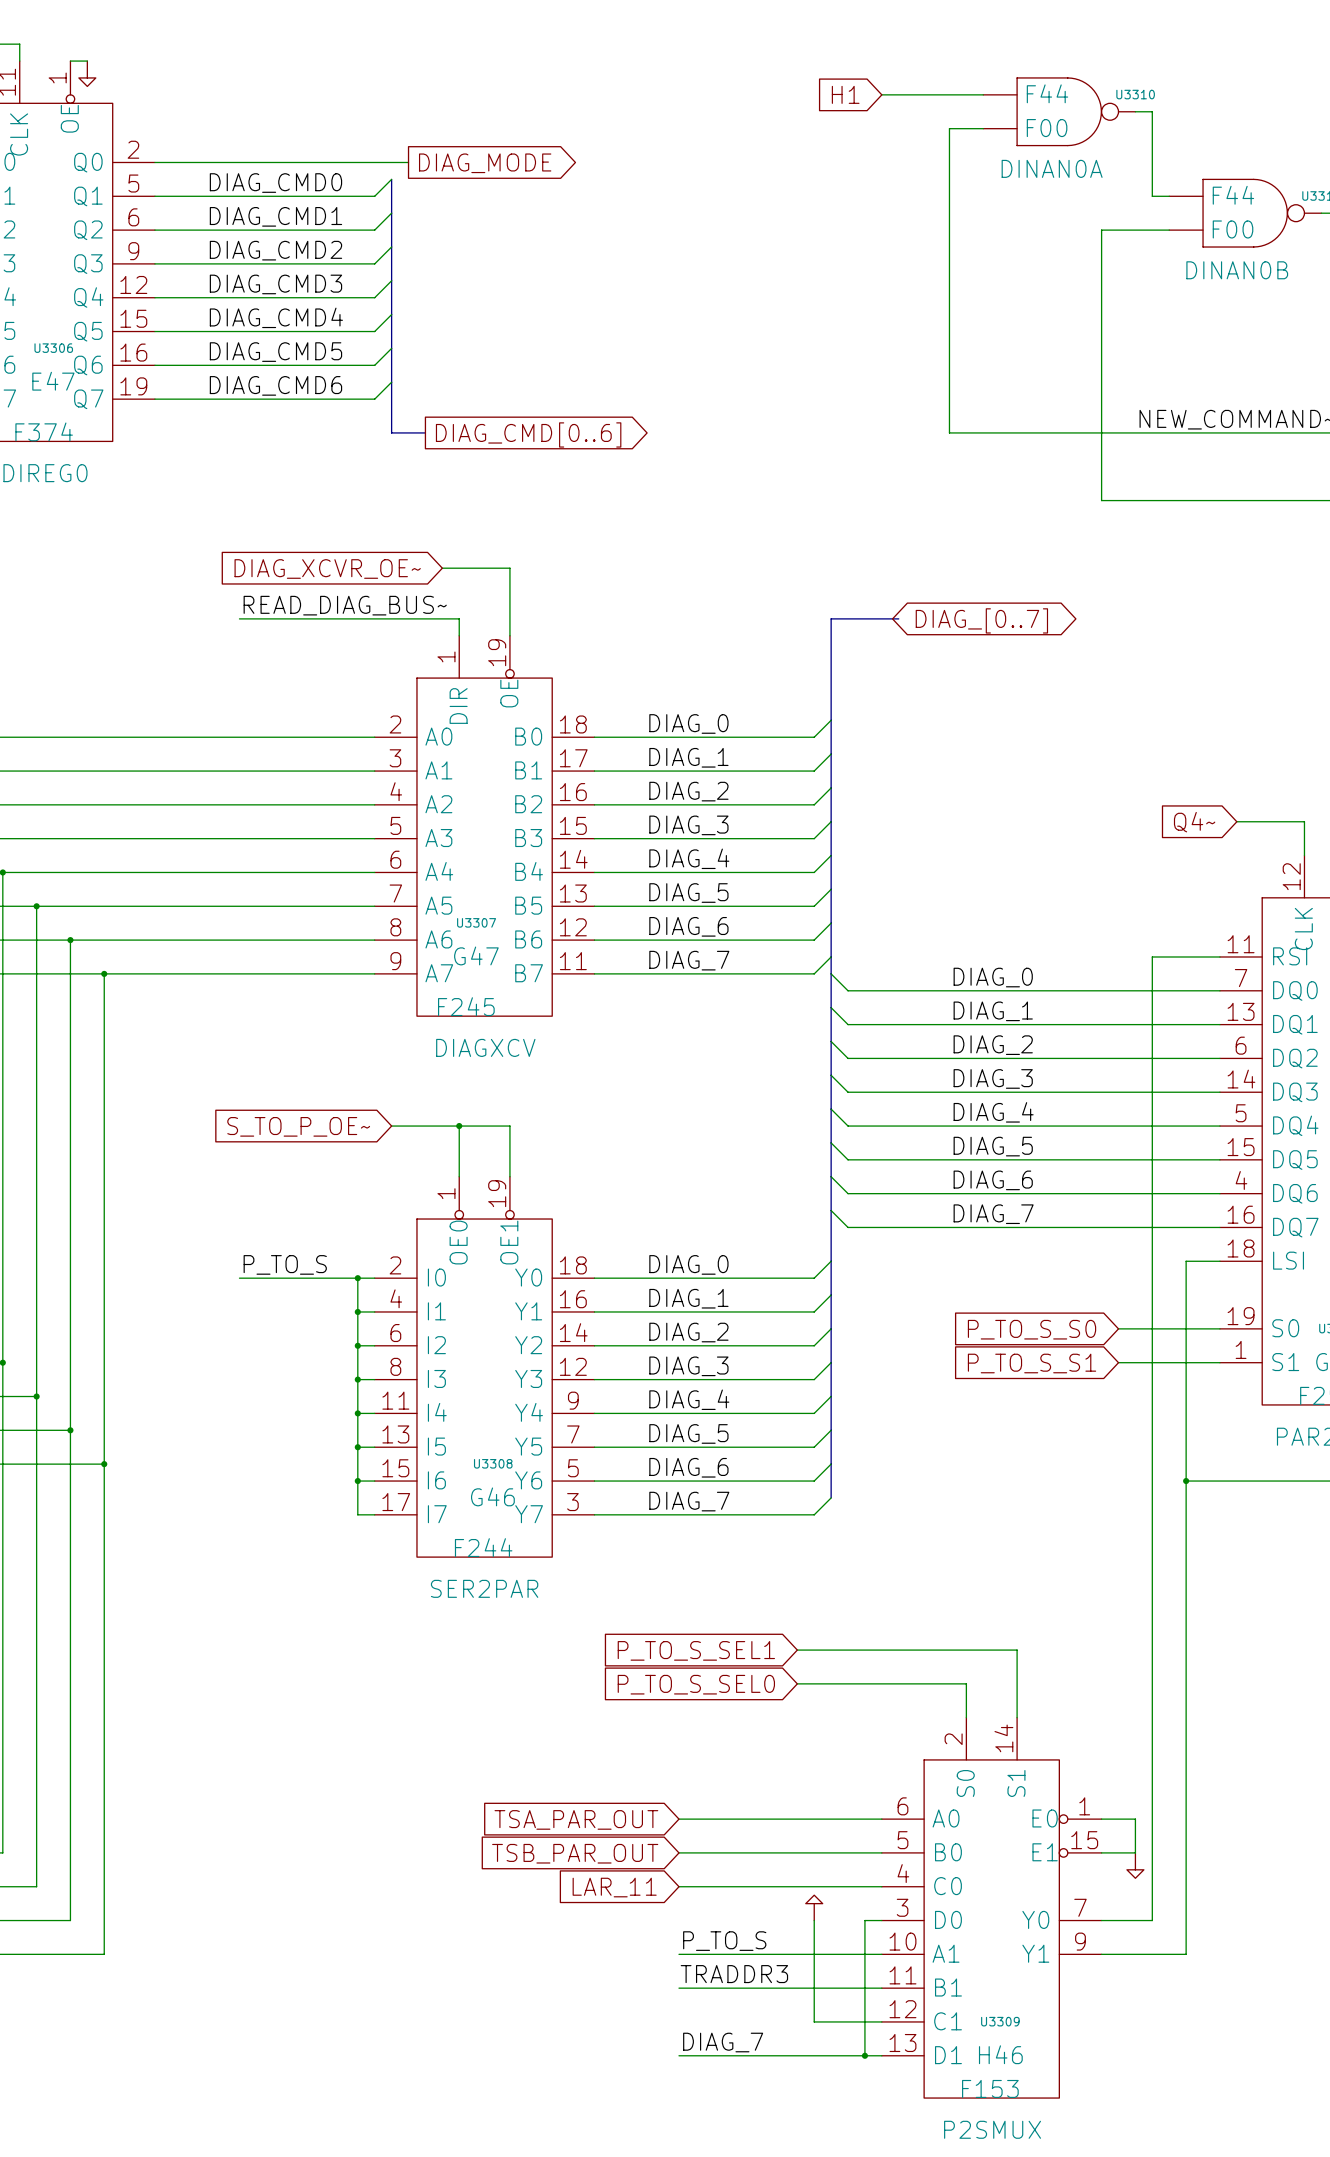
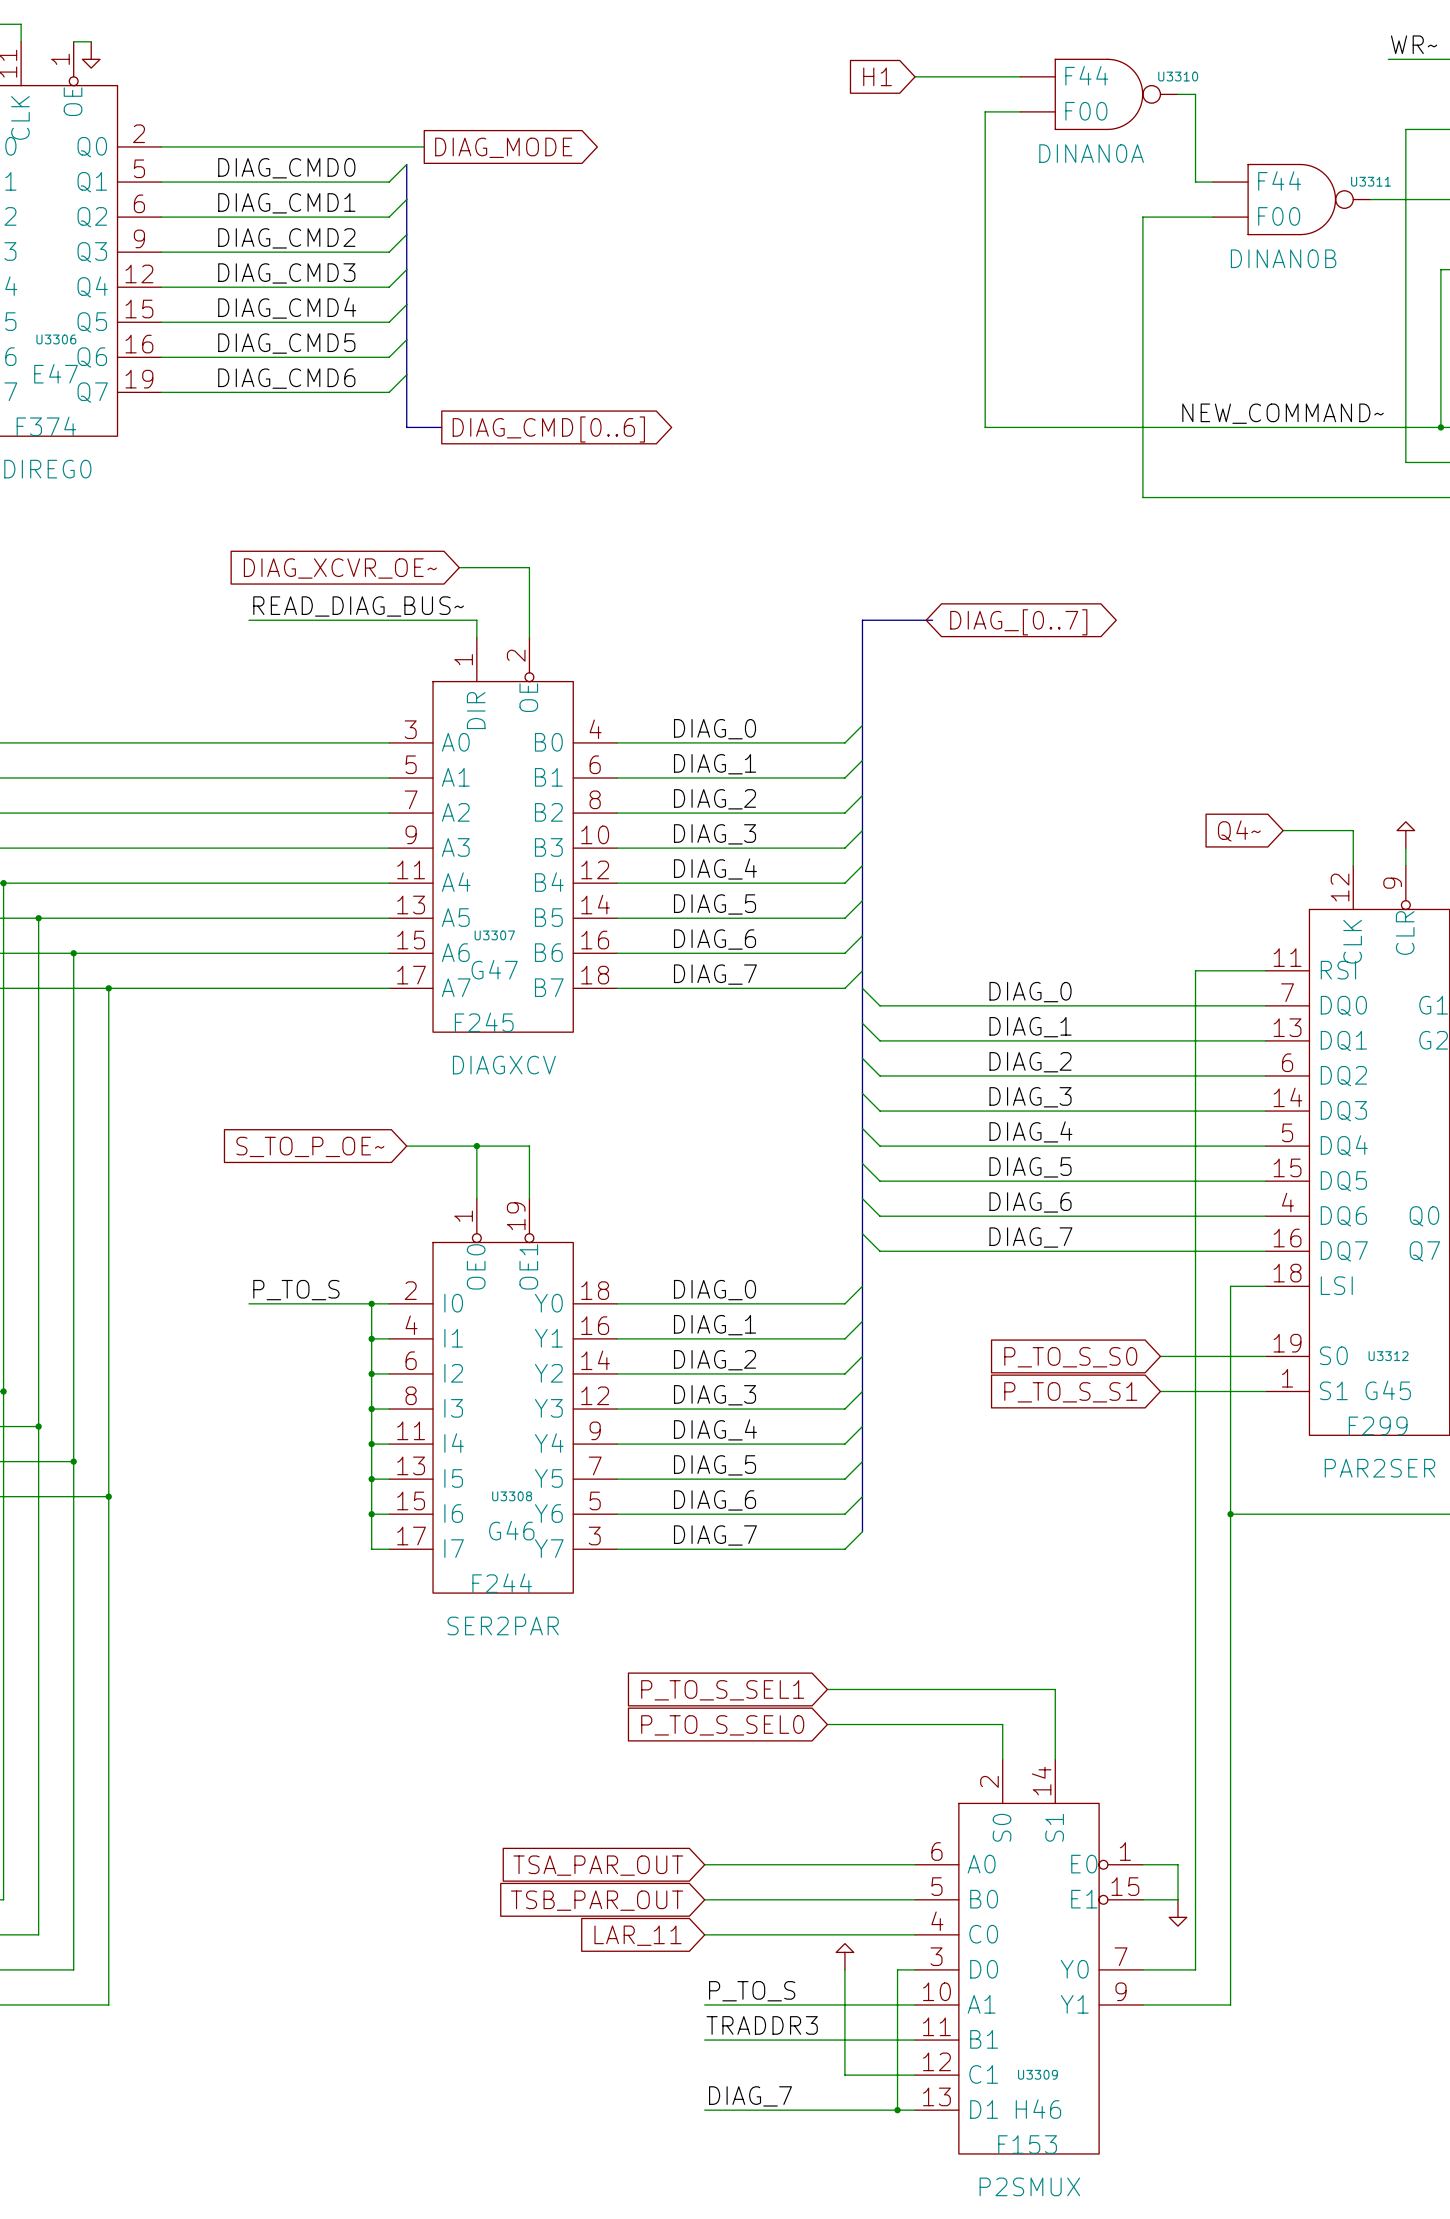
U3307 symbol: [374, 635, 595, 1017] -> [389, 637, 618, 1033]

